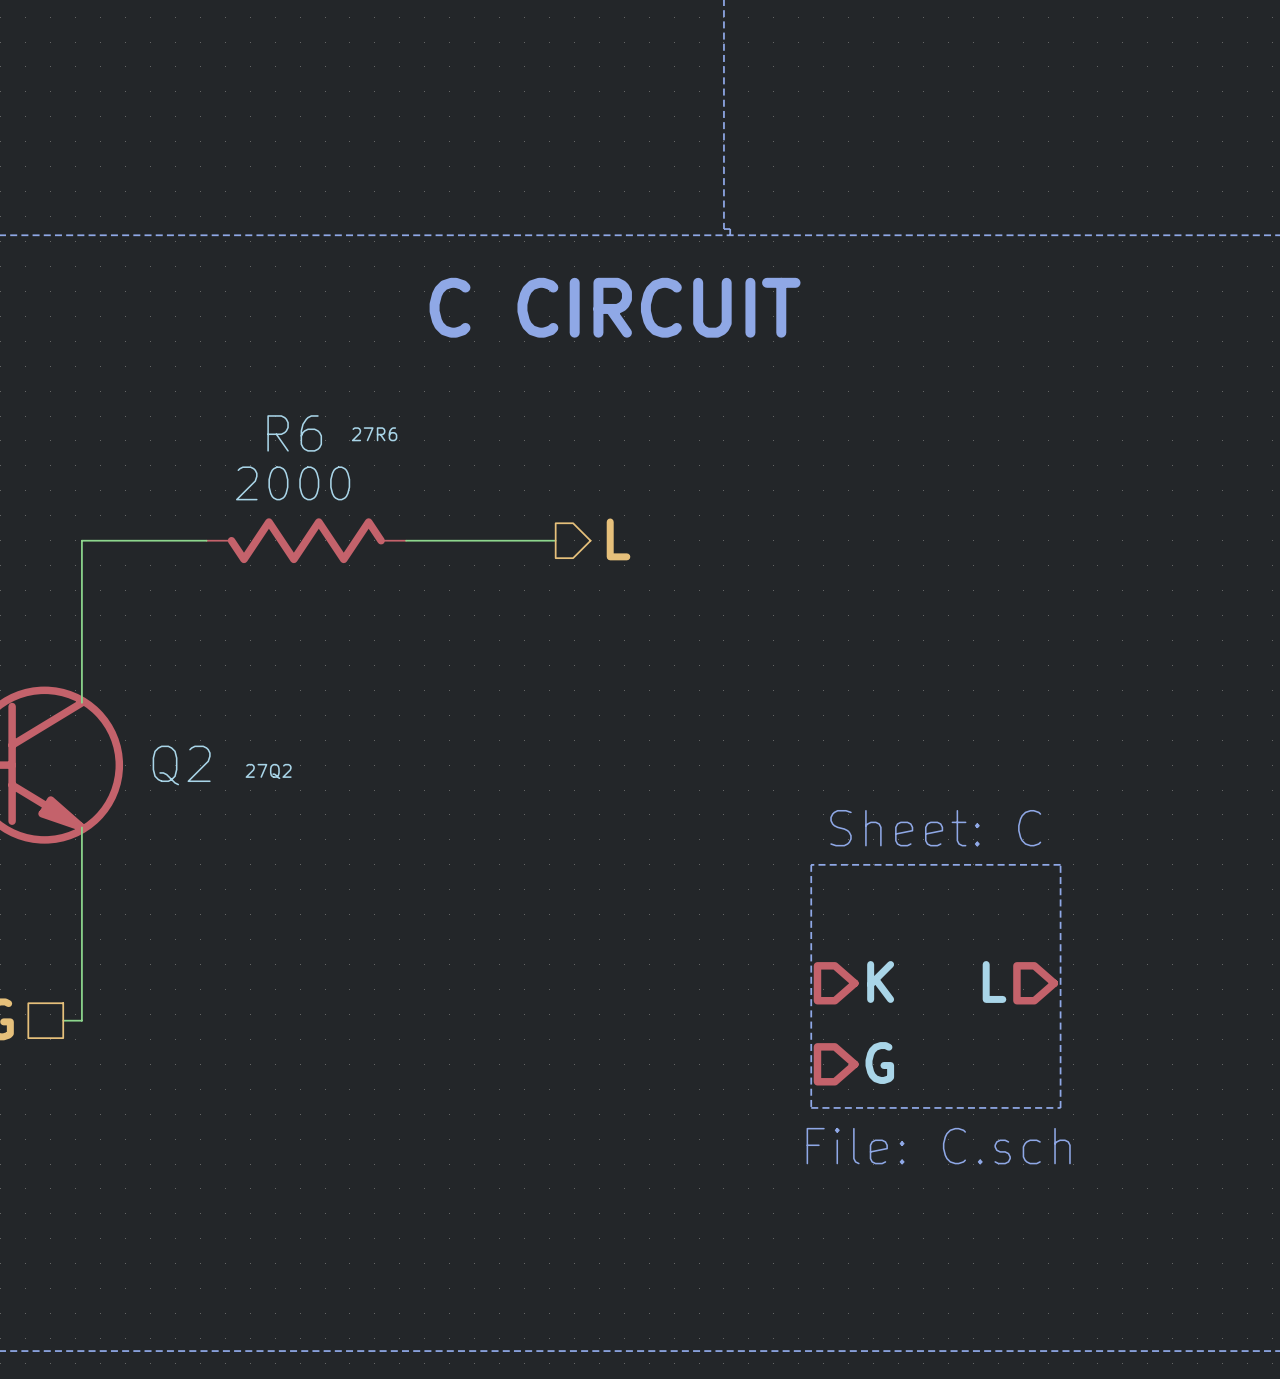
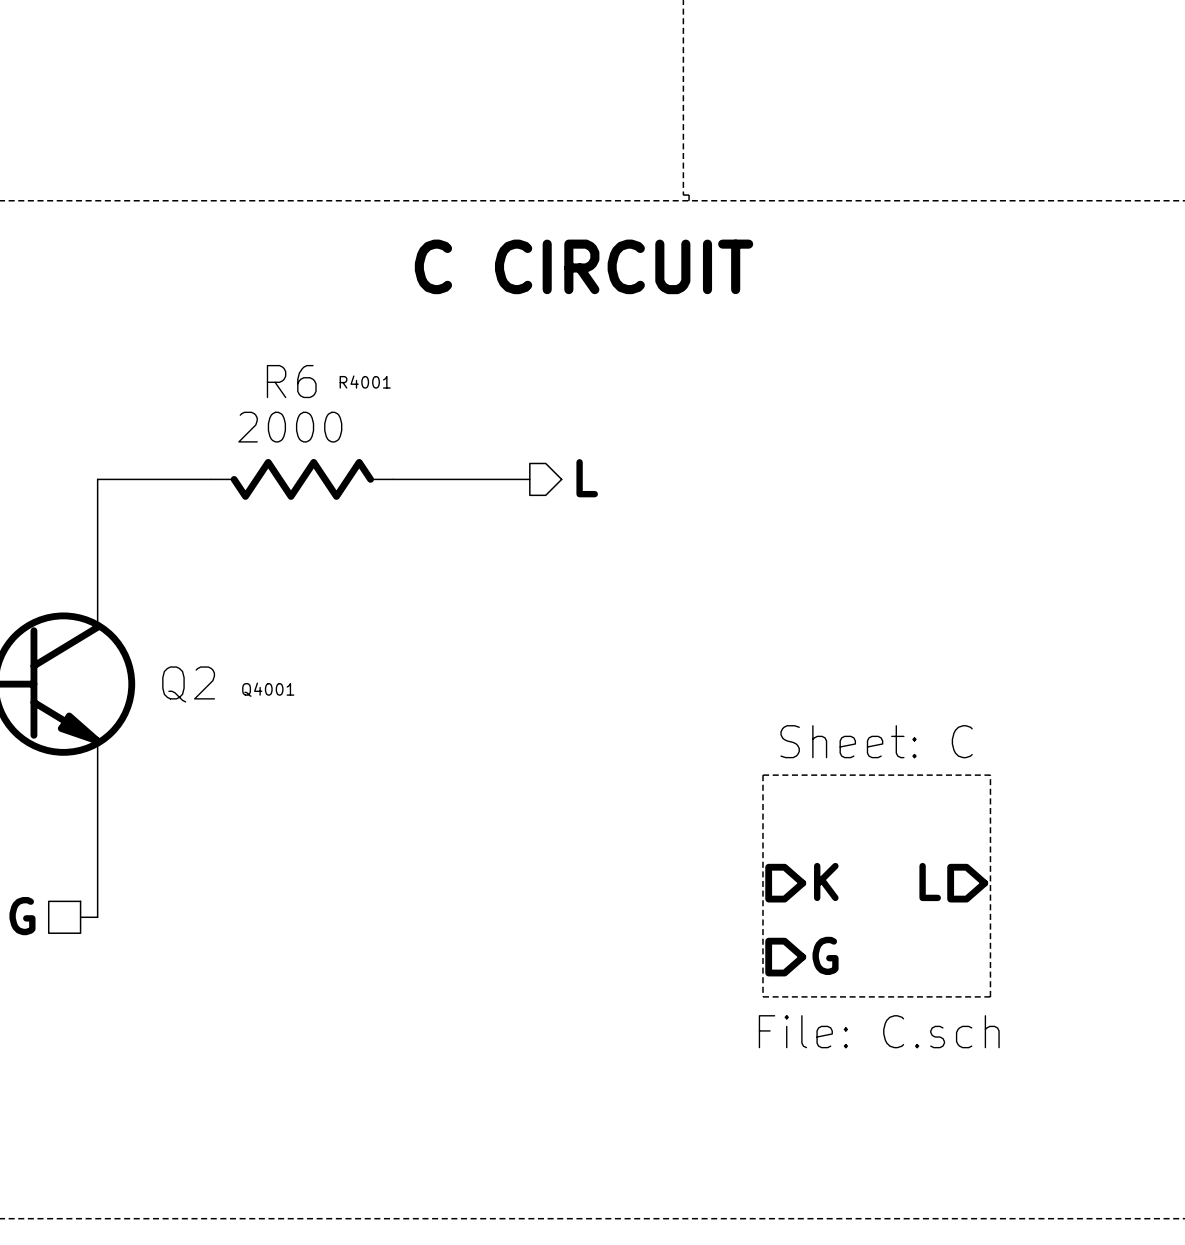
27R6 name: 27R6 (374, 434) -> R4001 (365, 382)
27Q2 name: 27Q2 (268, 771) -> Q4001 (268, 689)

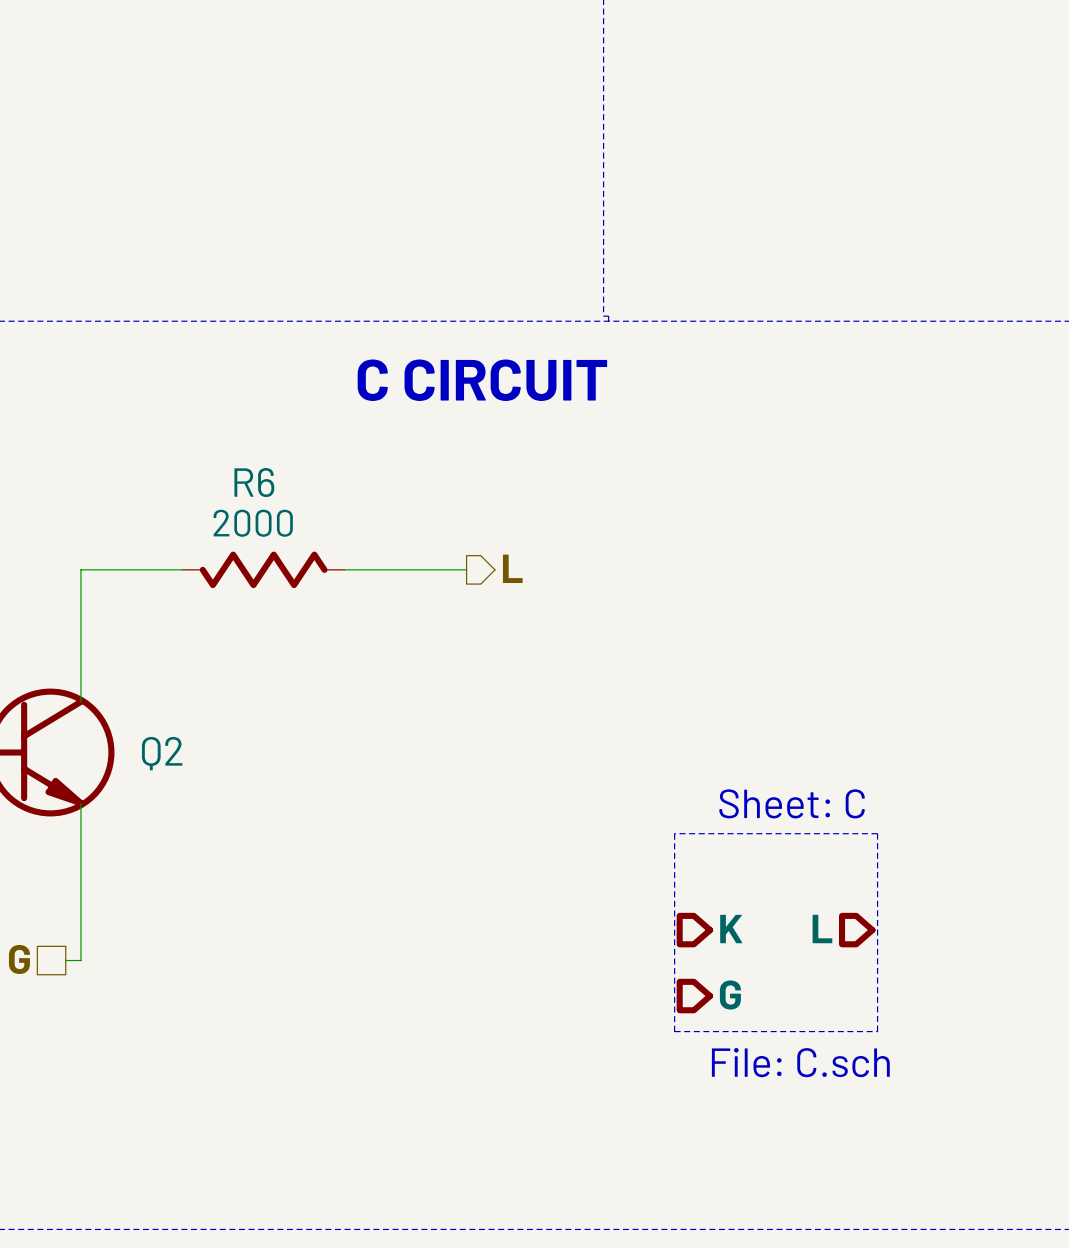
R4001 name: R4001 (365, 382) -> none
Q4001 name: Q4001 (268, 689) -> none

